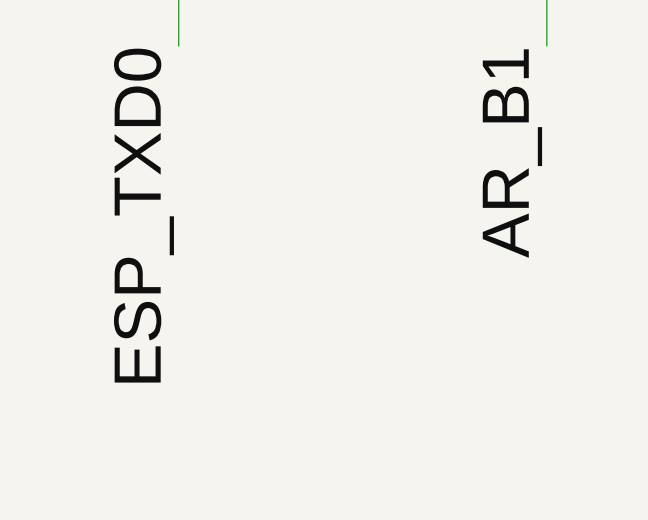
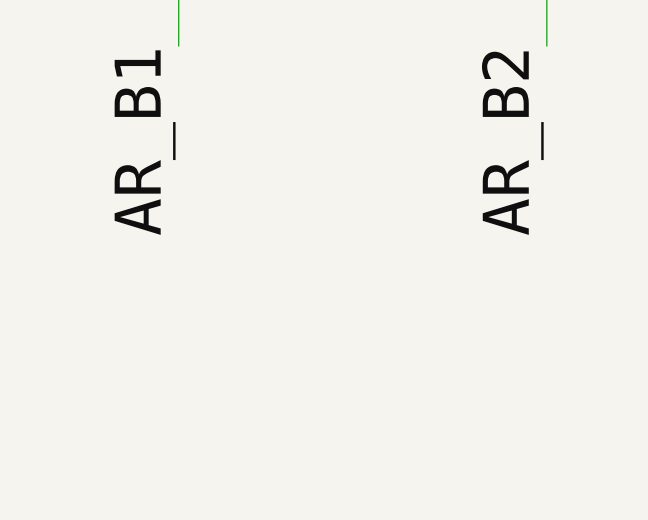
label: AR_B1 (512, 153) -> AR_B2 (512, 143)
label: ESP_TXD0 (143, 215) -> AR_B1 (145, 142)

